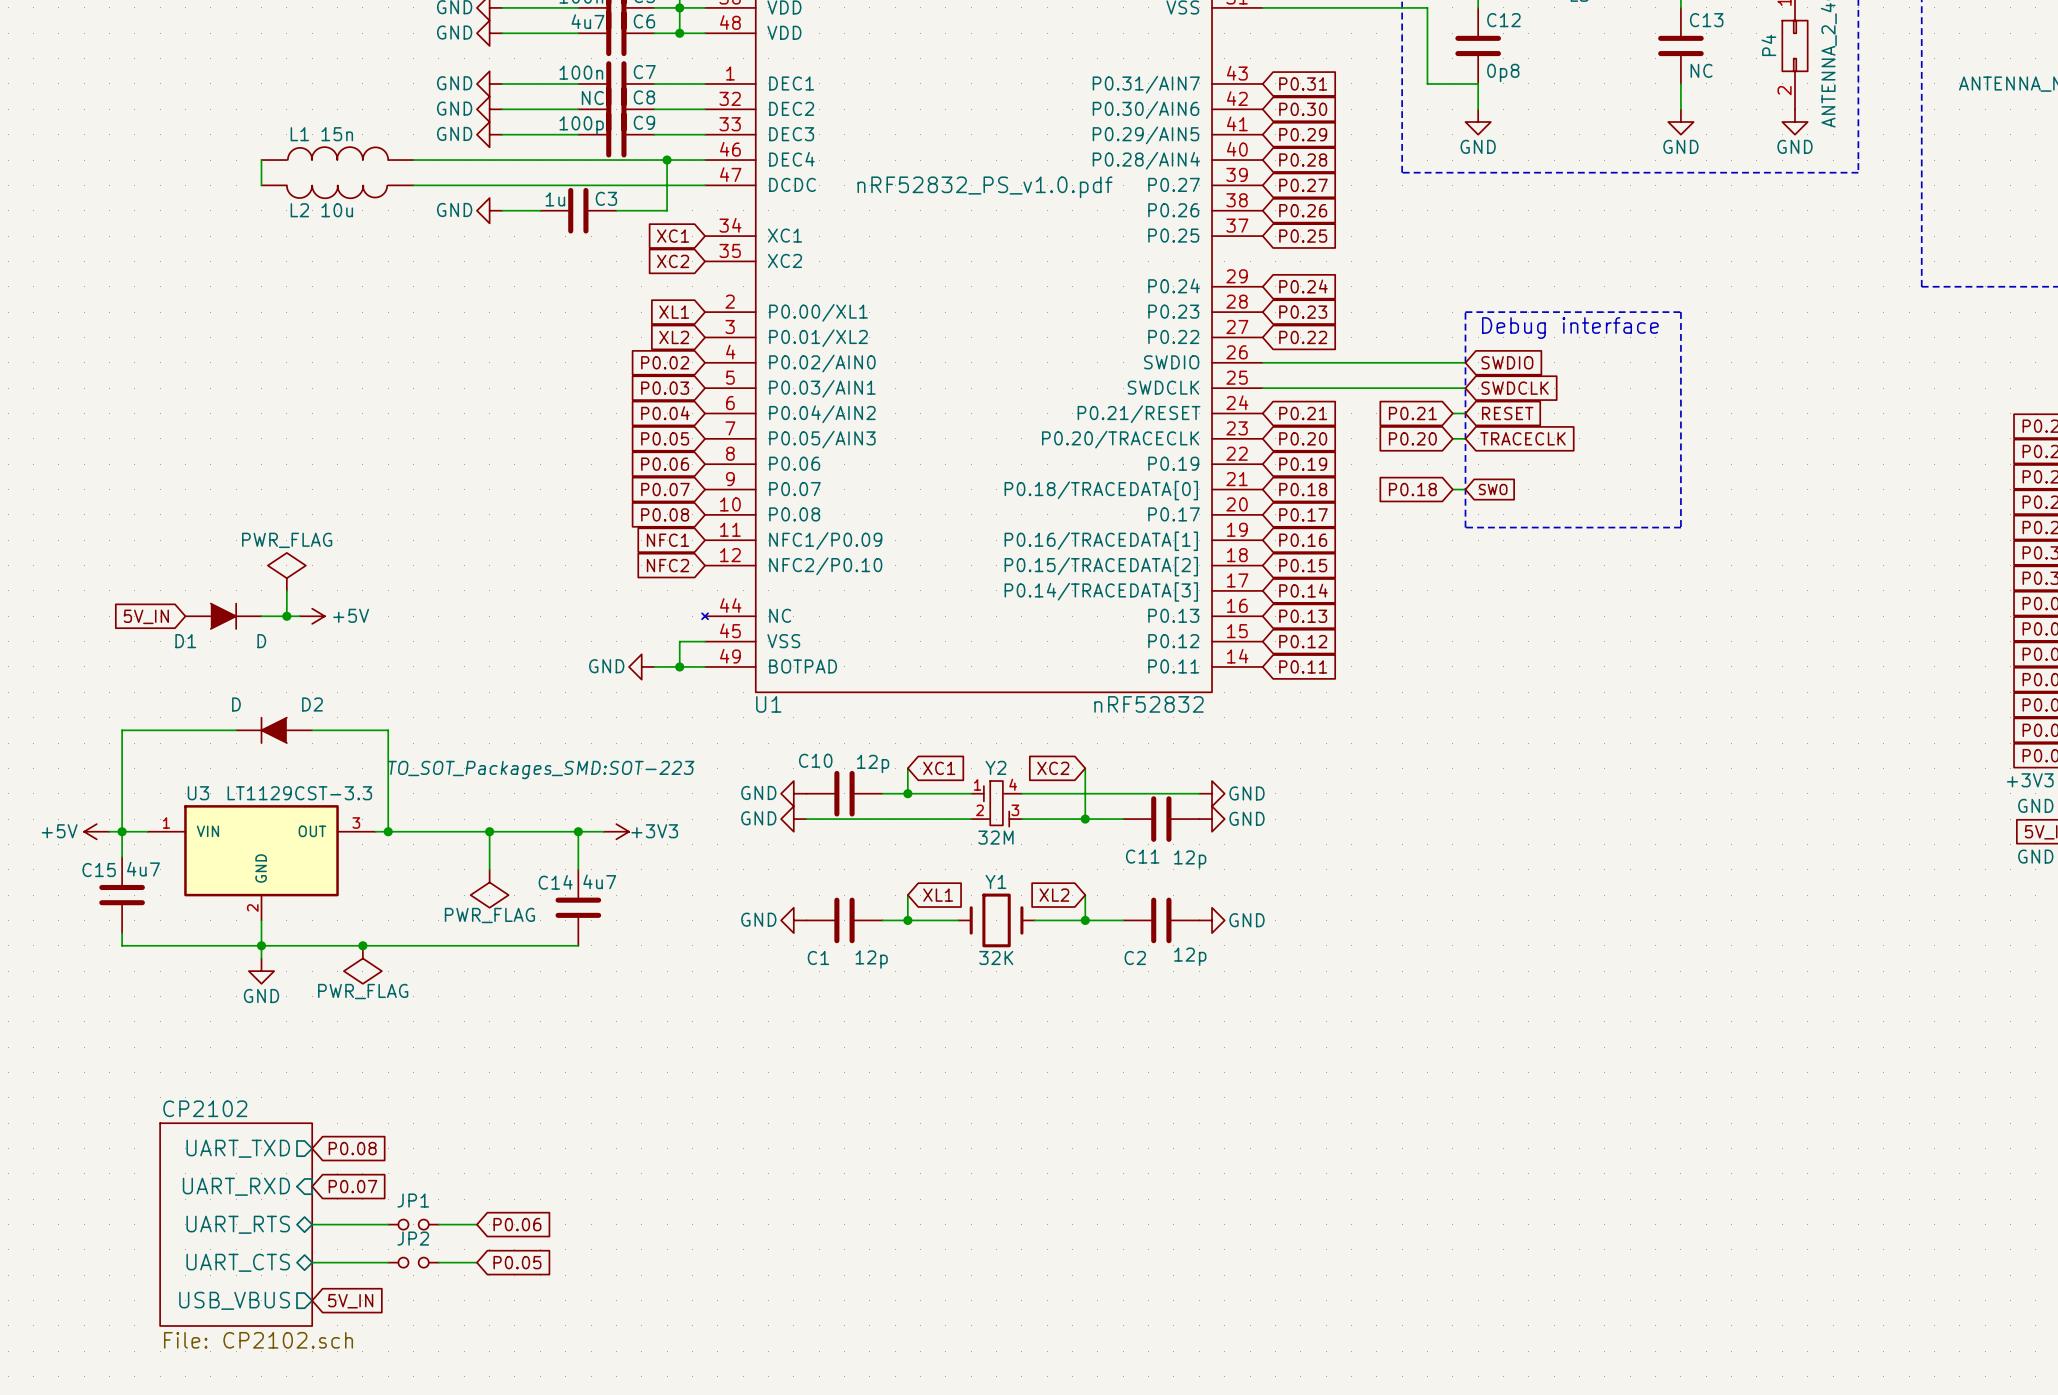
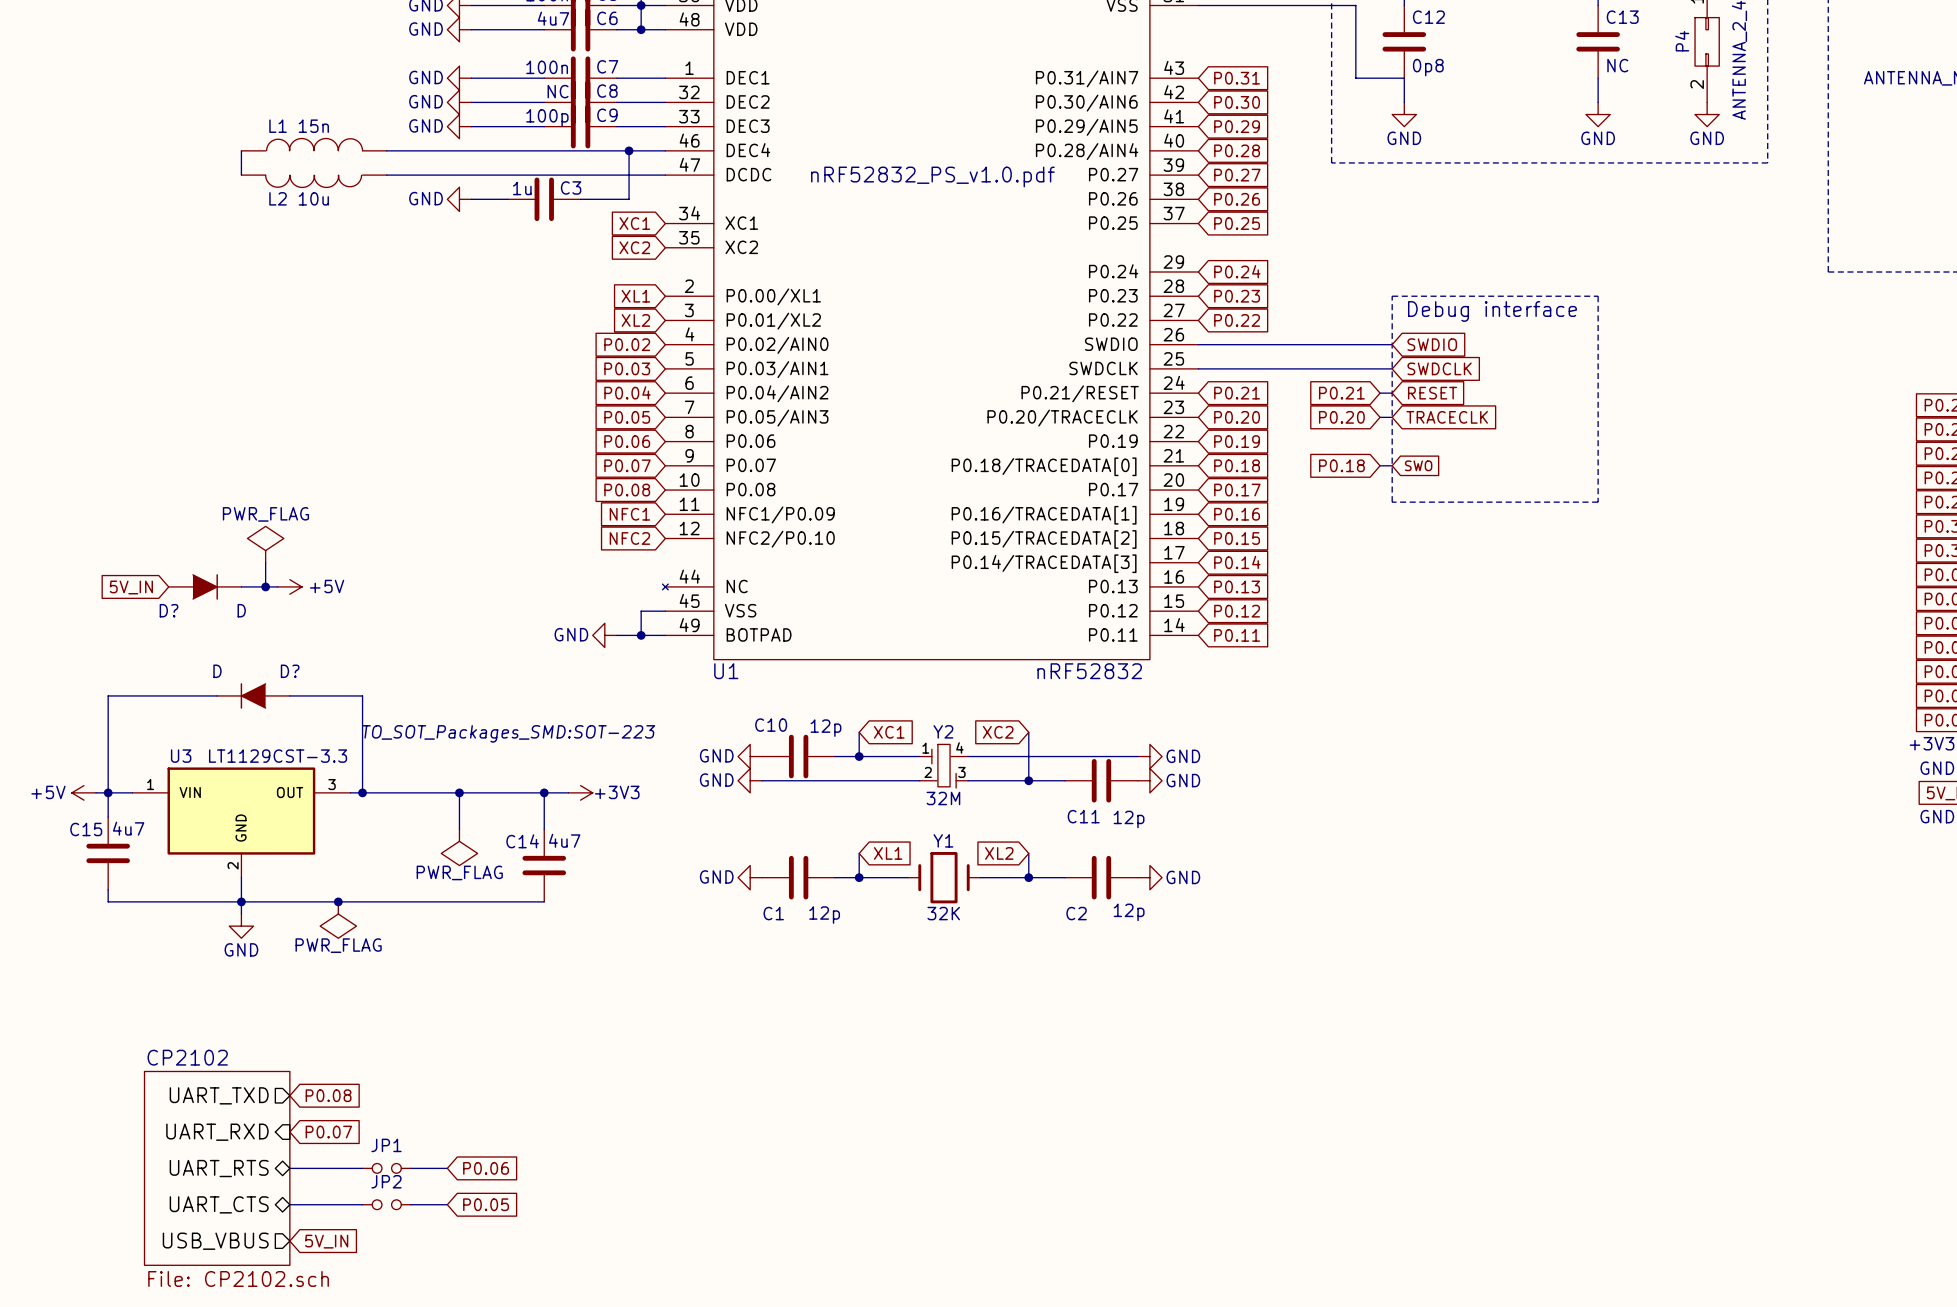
D1 name: D1 (185, 641) -> D? (169, 610)
D2 name: D2 (312, 704) -> D? (290, 671)

